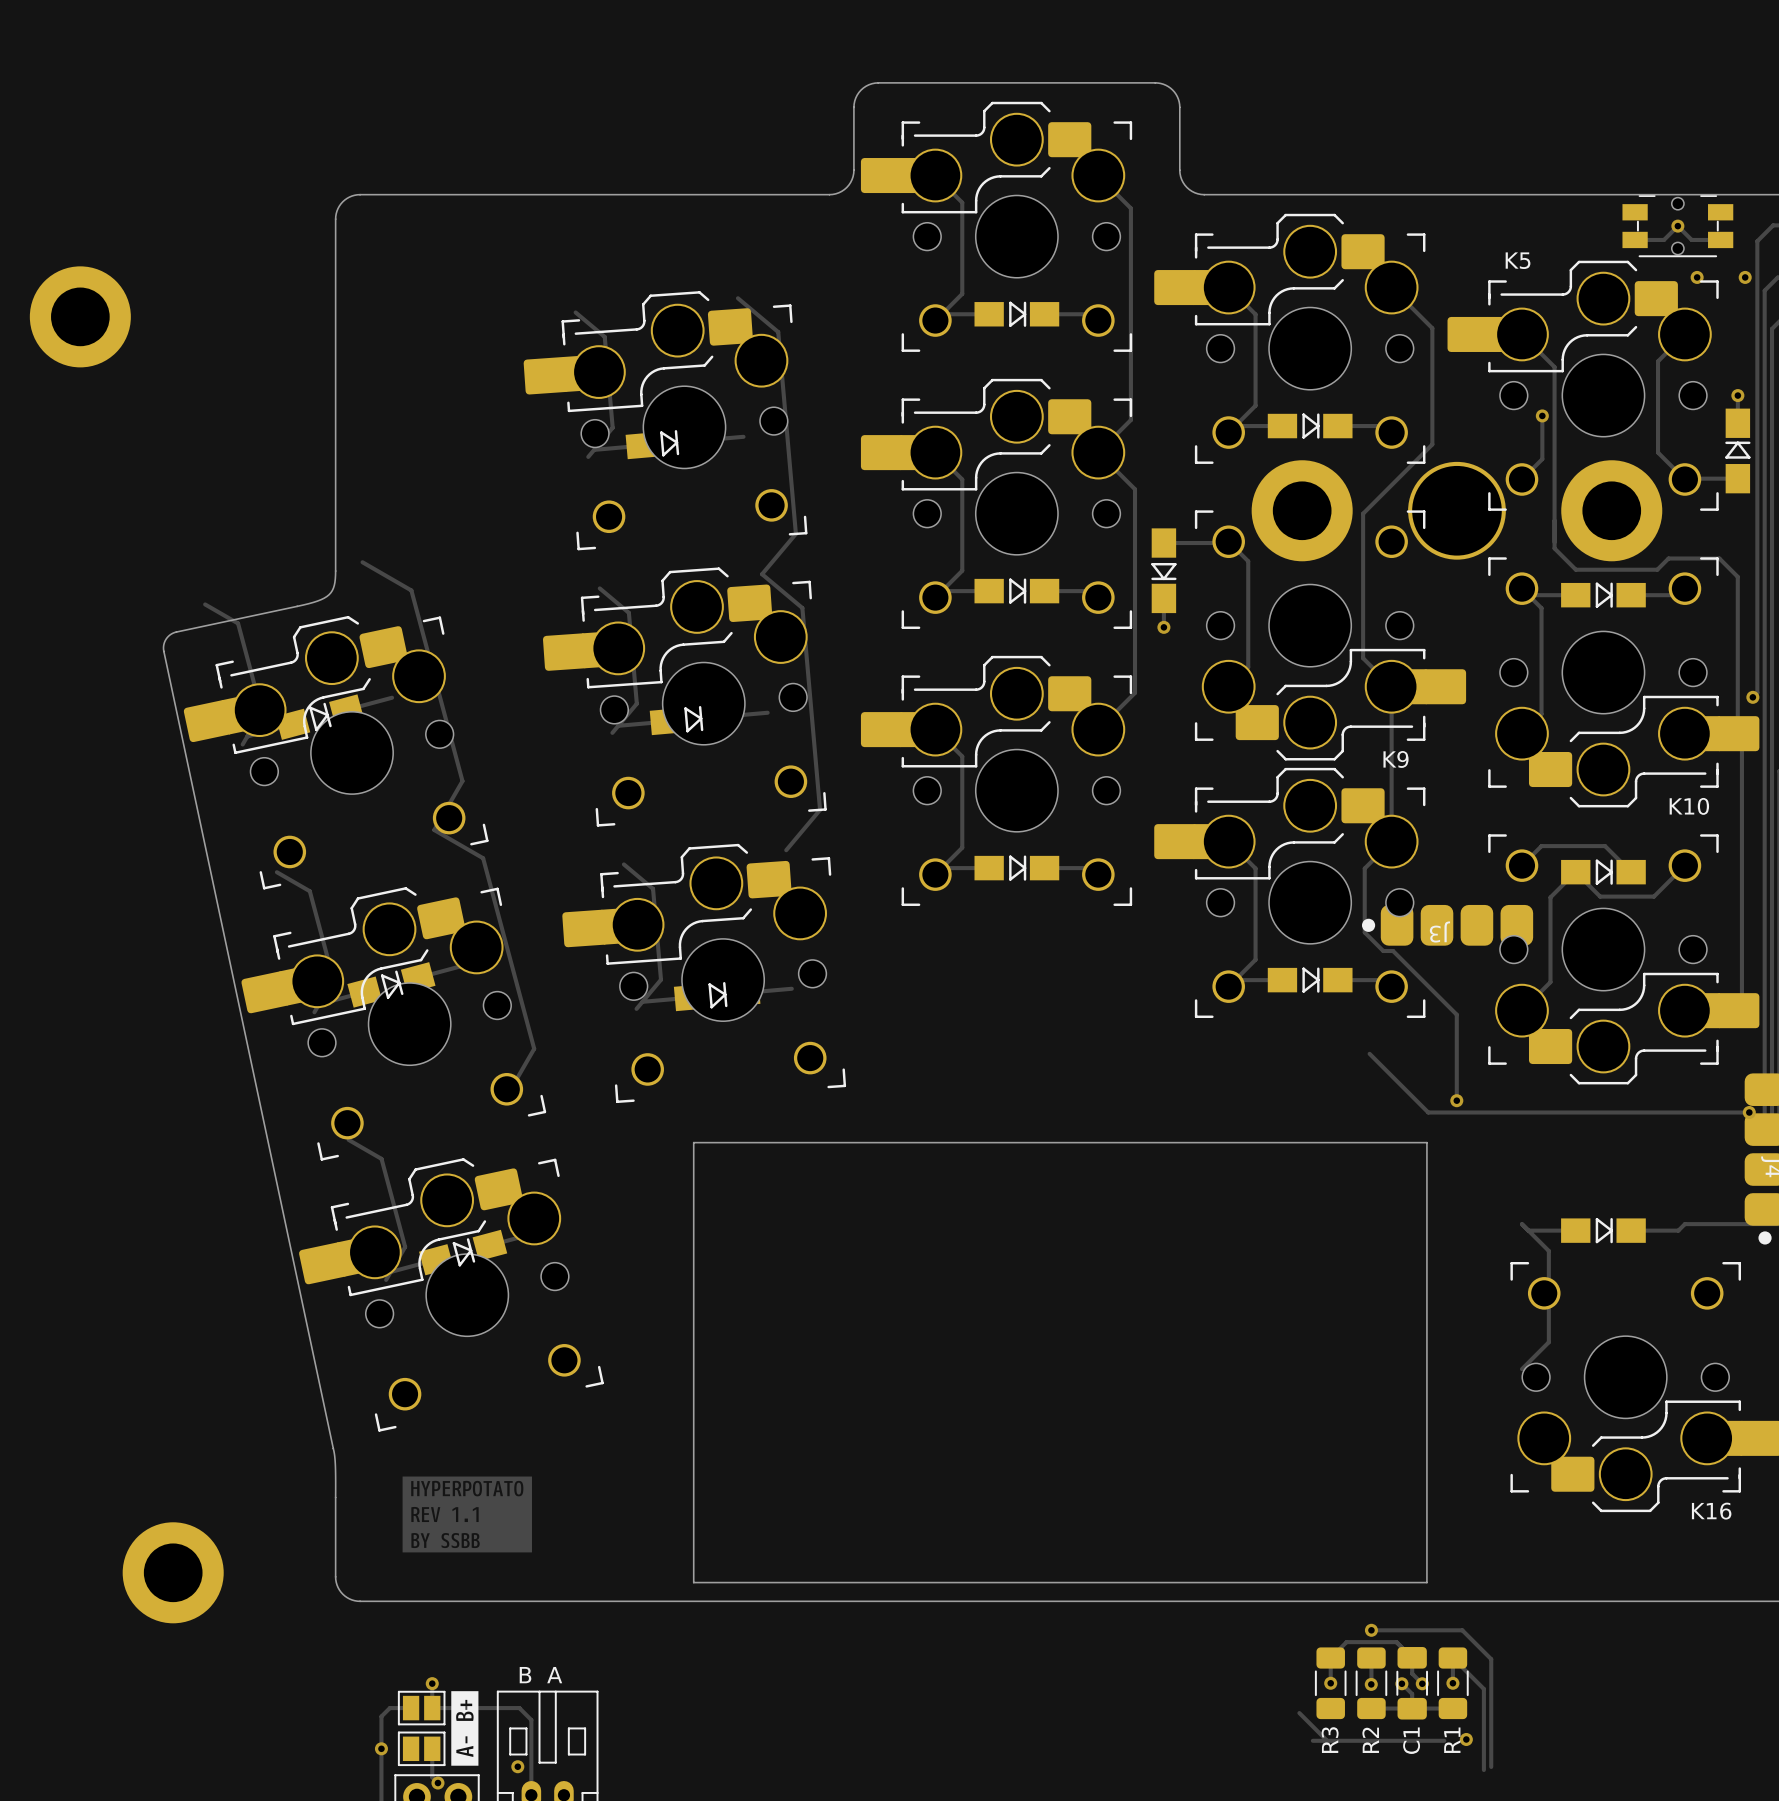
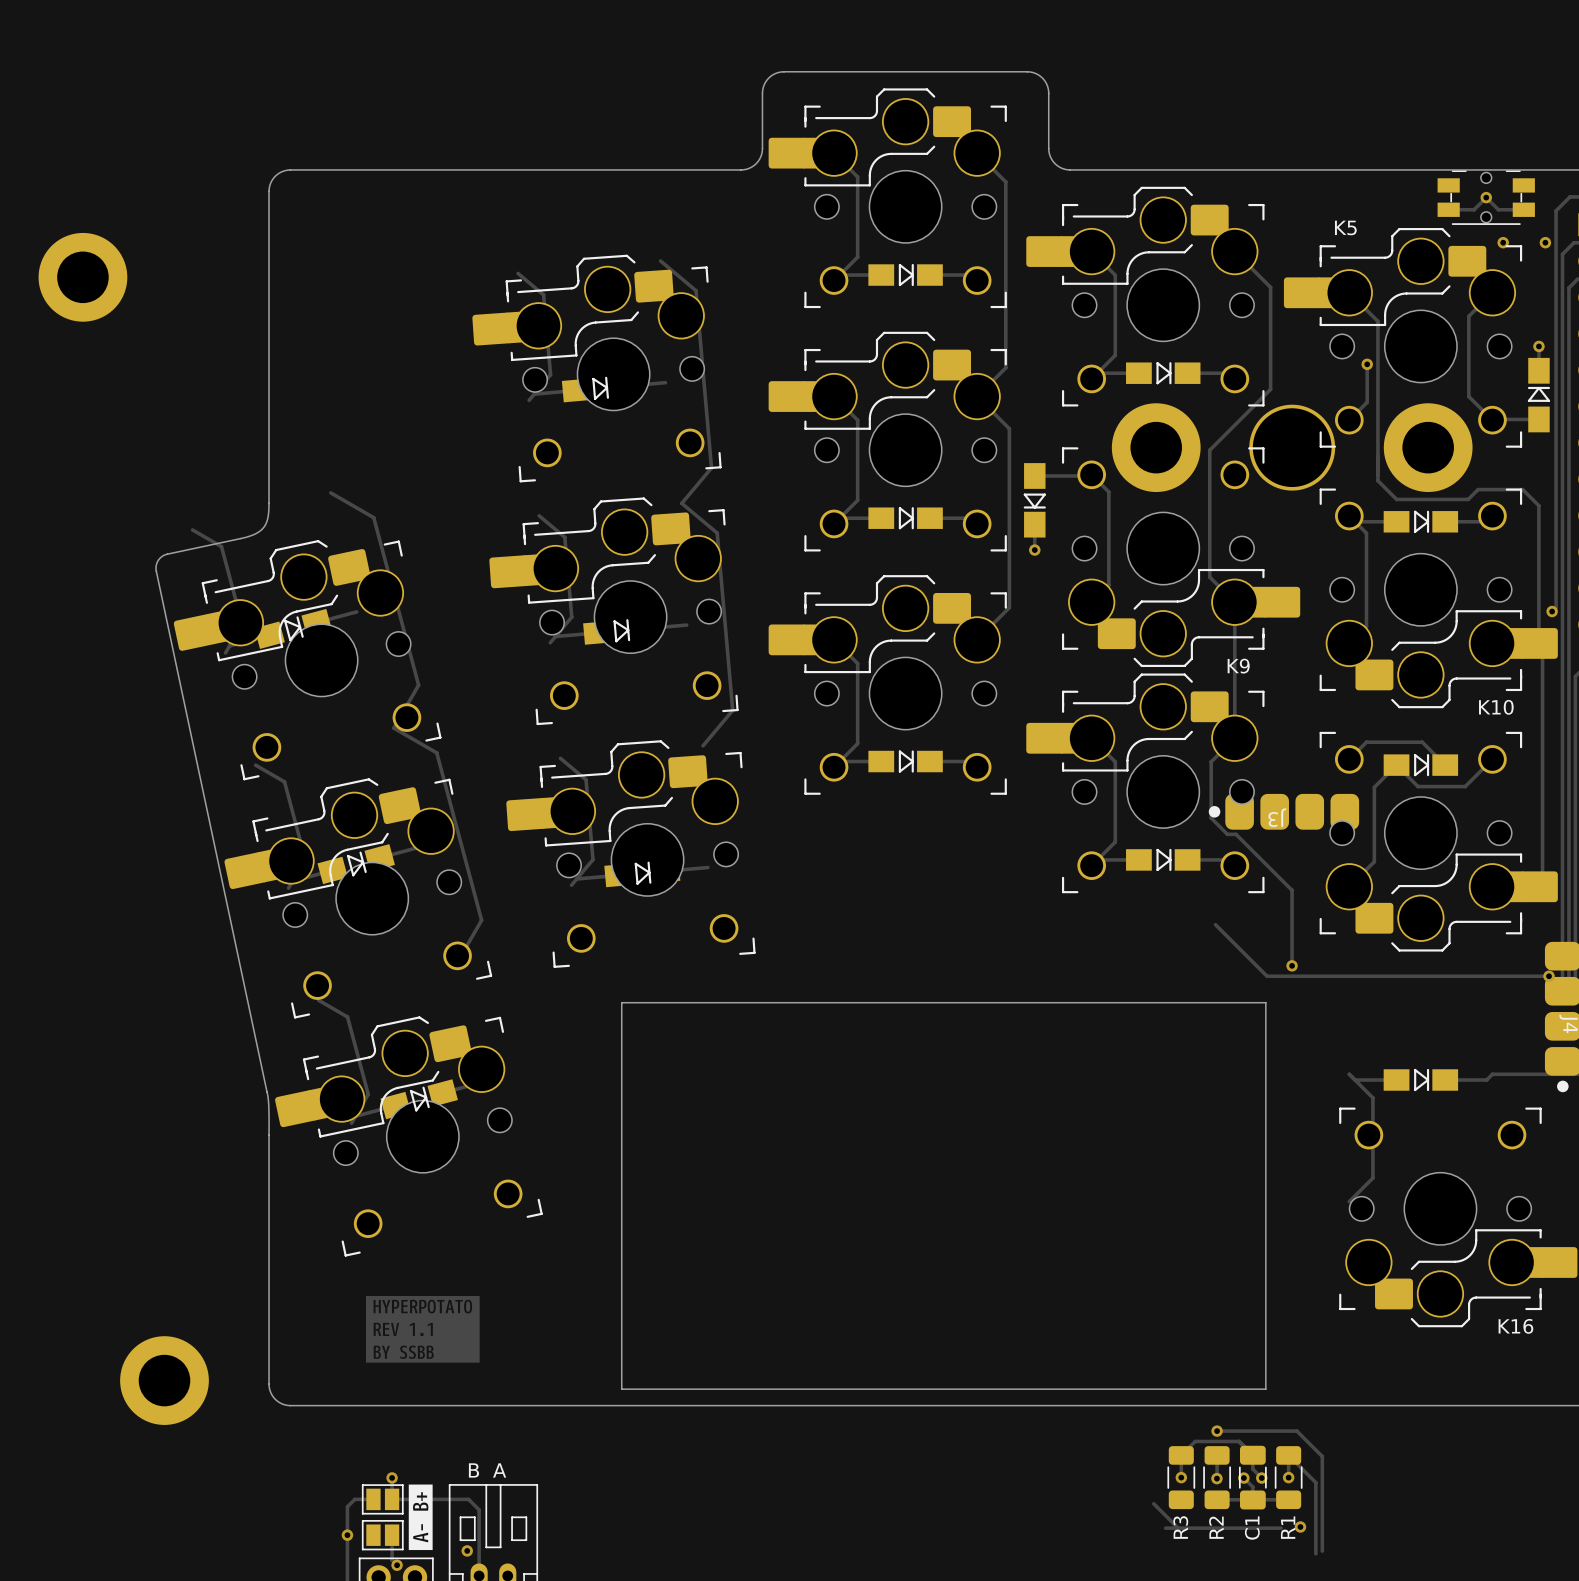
board edge: (360, 194) (351, 196) (342, 201) (335, 216) (334, 585) (329, 594) (317, 601) (260, 614) -> (328, 169) (285, 170) (275, 176) (269, 186) (268, 510) (266, 522) (262, 528) (252, 535) (240, 538)
board edge: (289, 1244) (334, 1454) (336, 1582) (344, 1595) (360, 1601) -> (266, 1091) (269, 1117) (269, 1388) (275, 1399) (285, 1405) (328, 1405)

